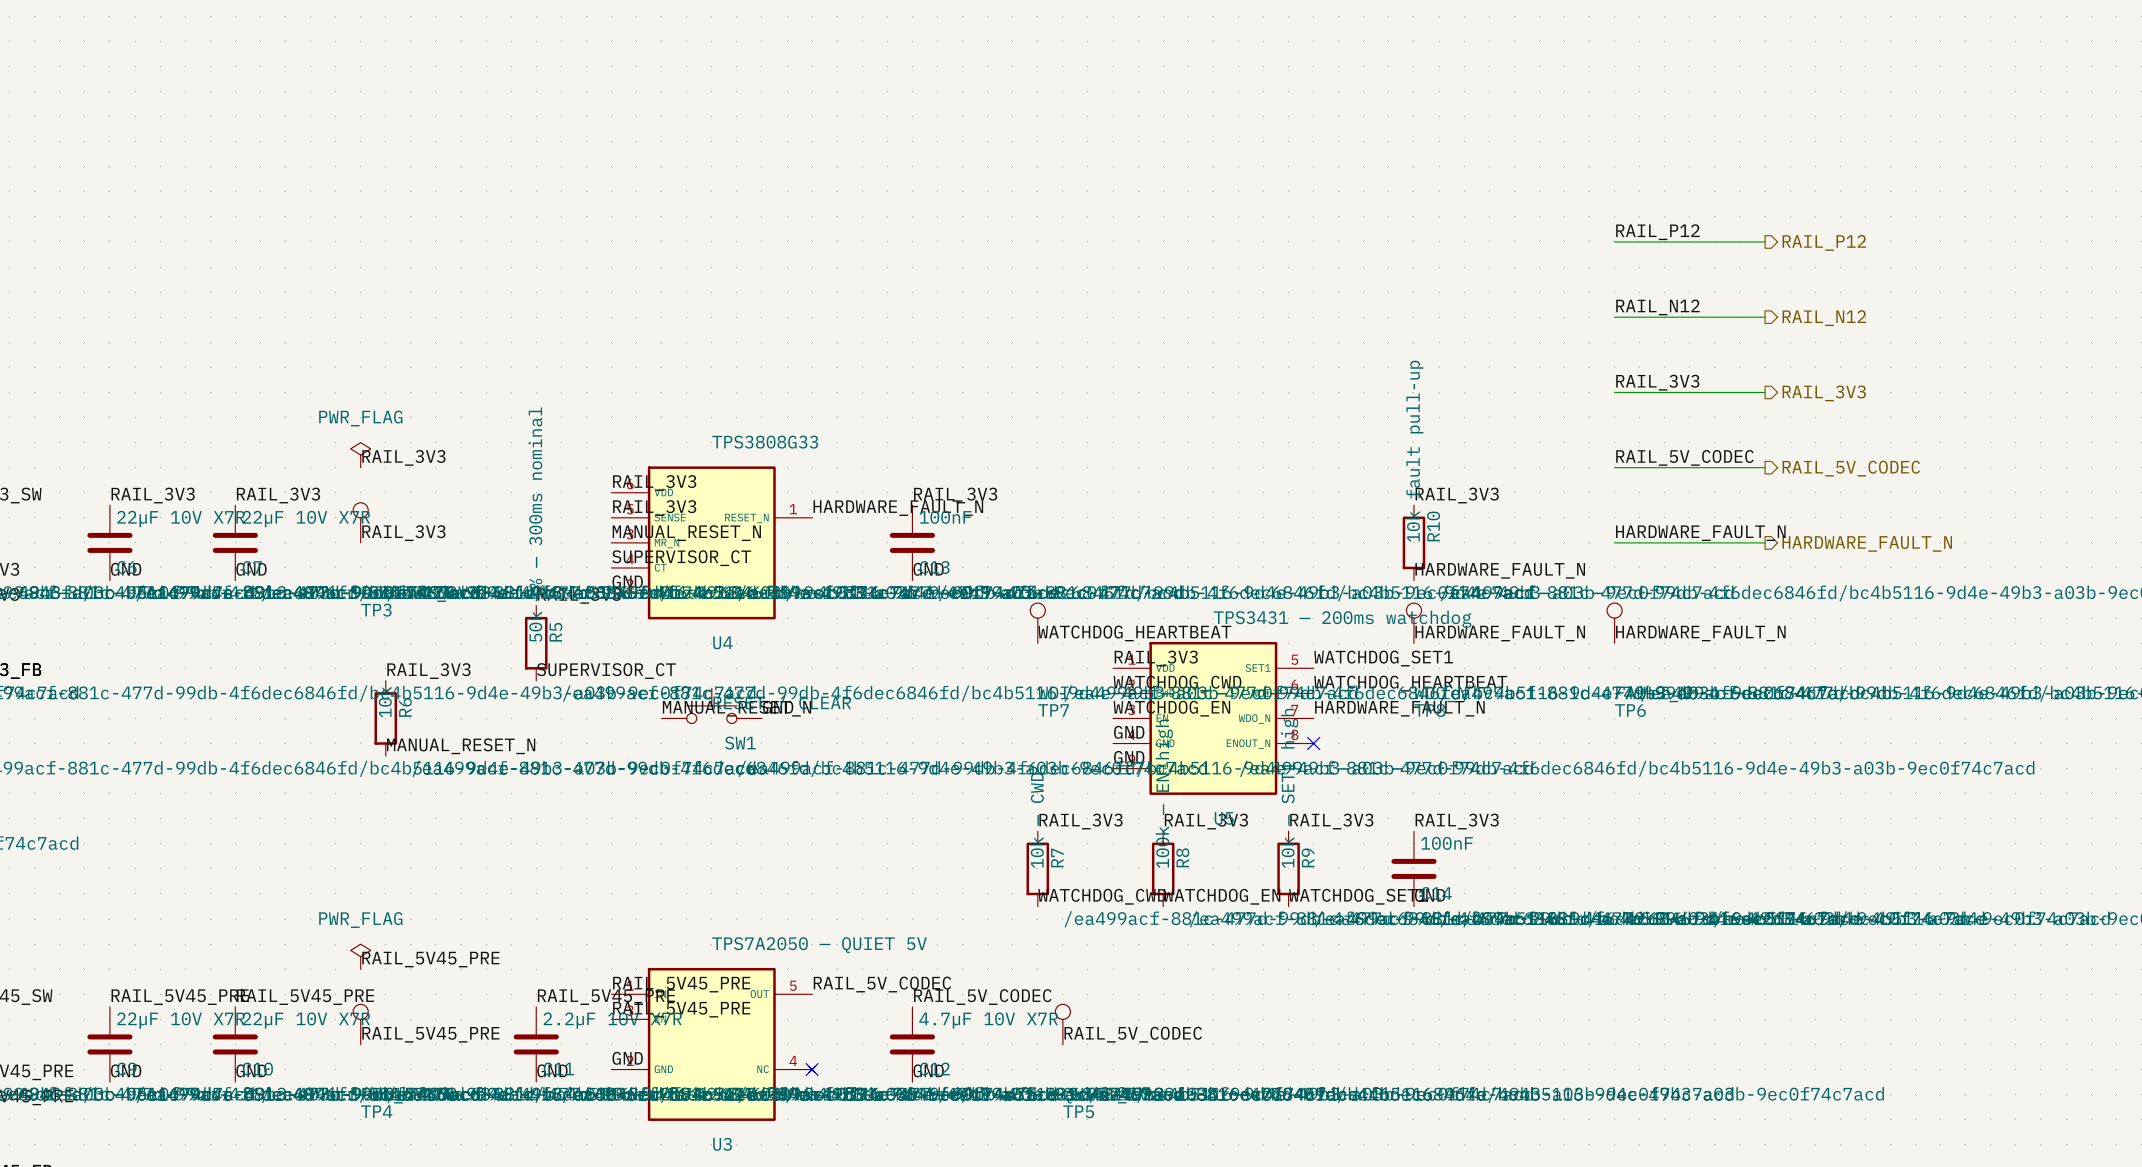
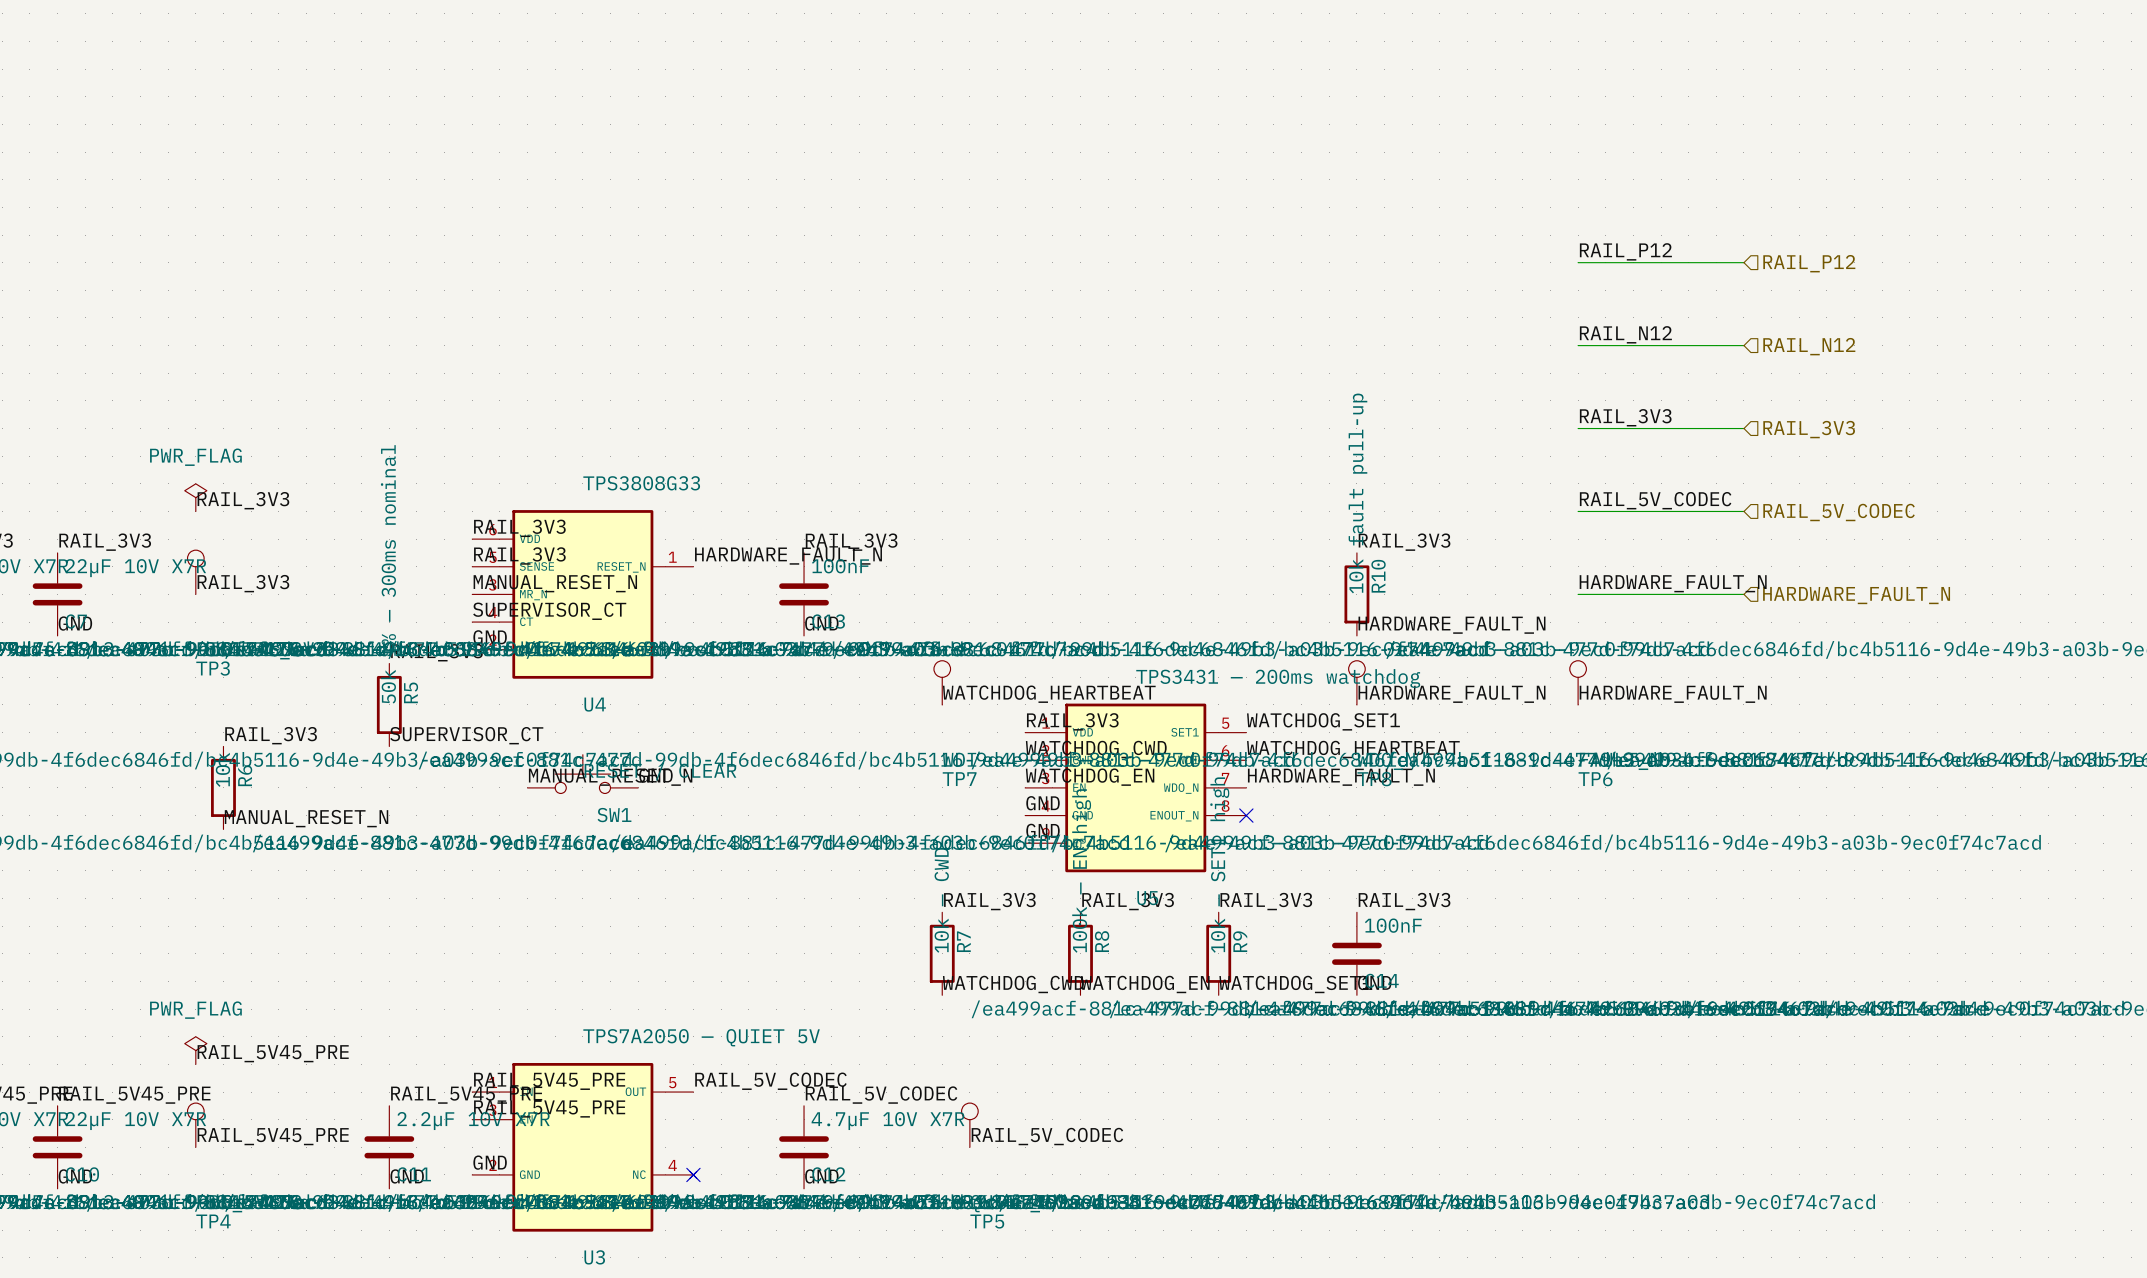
hierarchical label shape: output (1824, 242) -> input (1809, 263)
hierarchical label shape: output (1824, 318) -> input (1809, 346)
hierarchical label shape: output (1824, 393) -> input (1809, 429)
hierarchical label shape: output (1851, 468) -> input (1839, 512)
hierarchical label shape: output (1867, 543) -> input (1856, 595)

